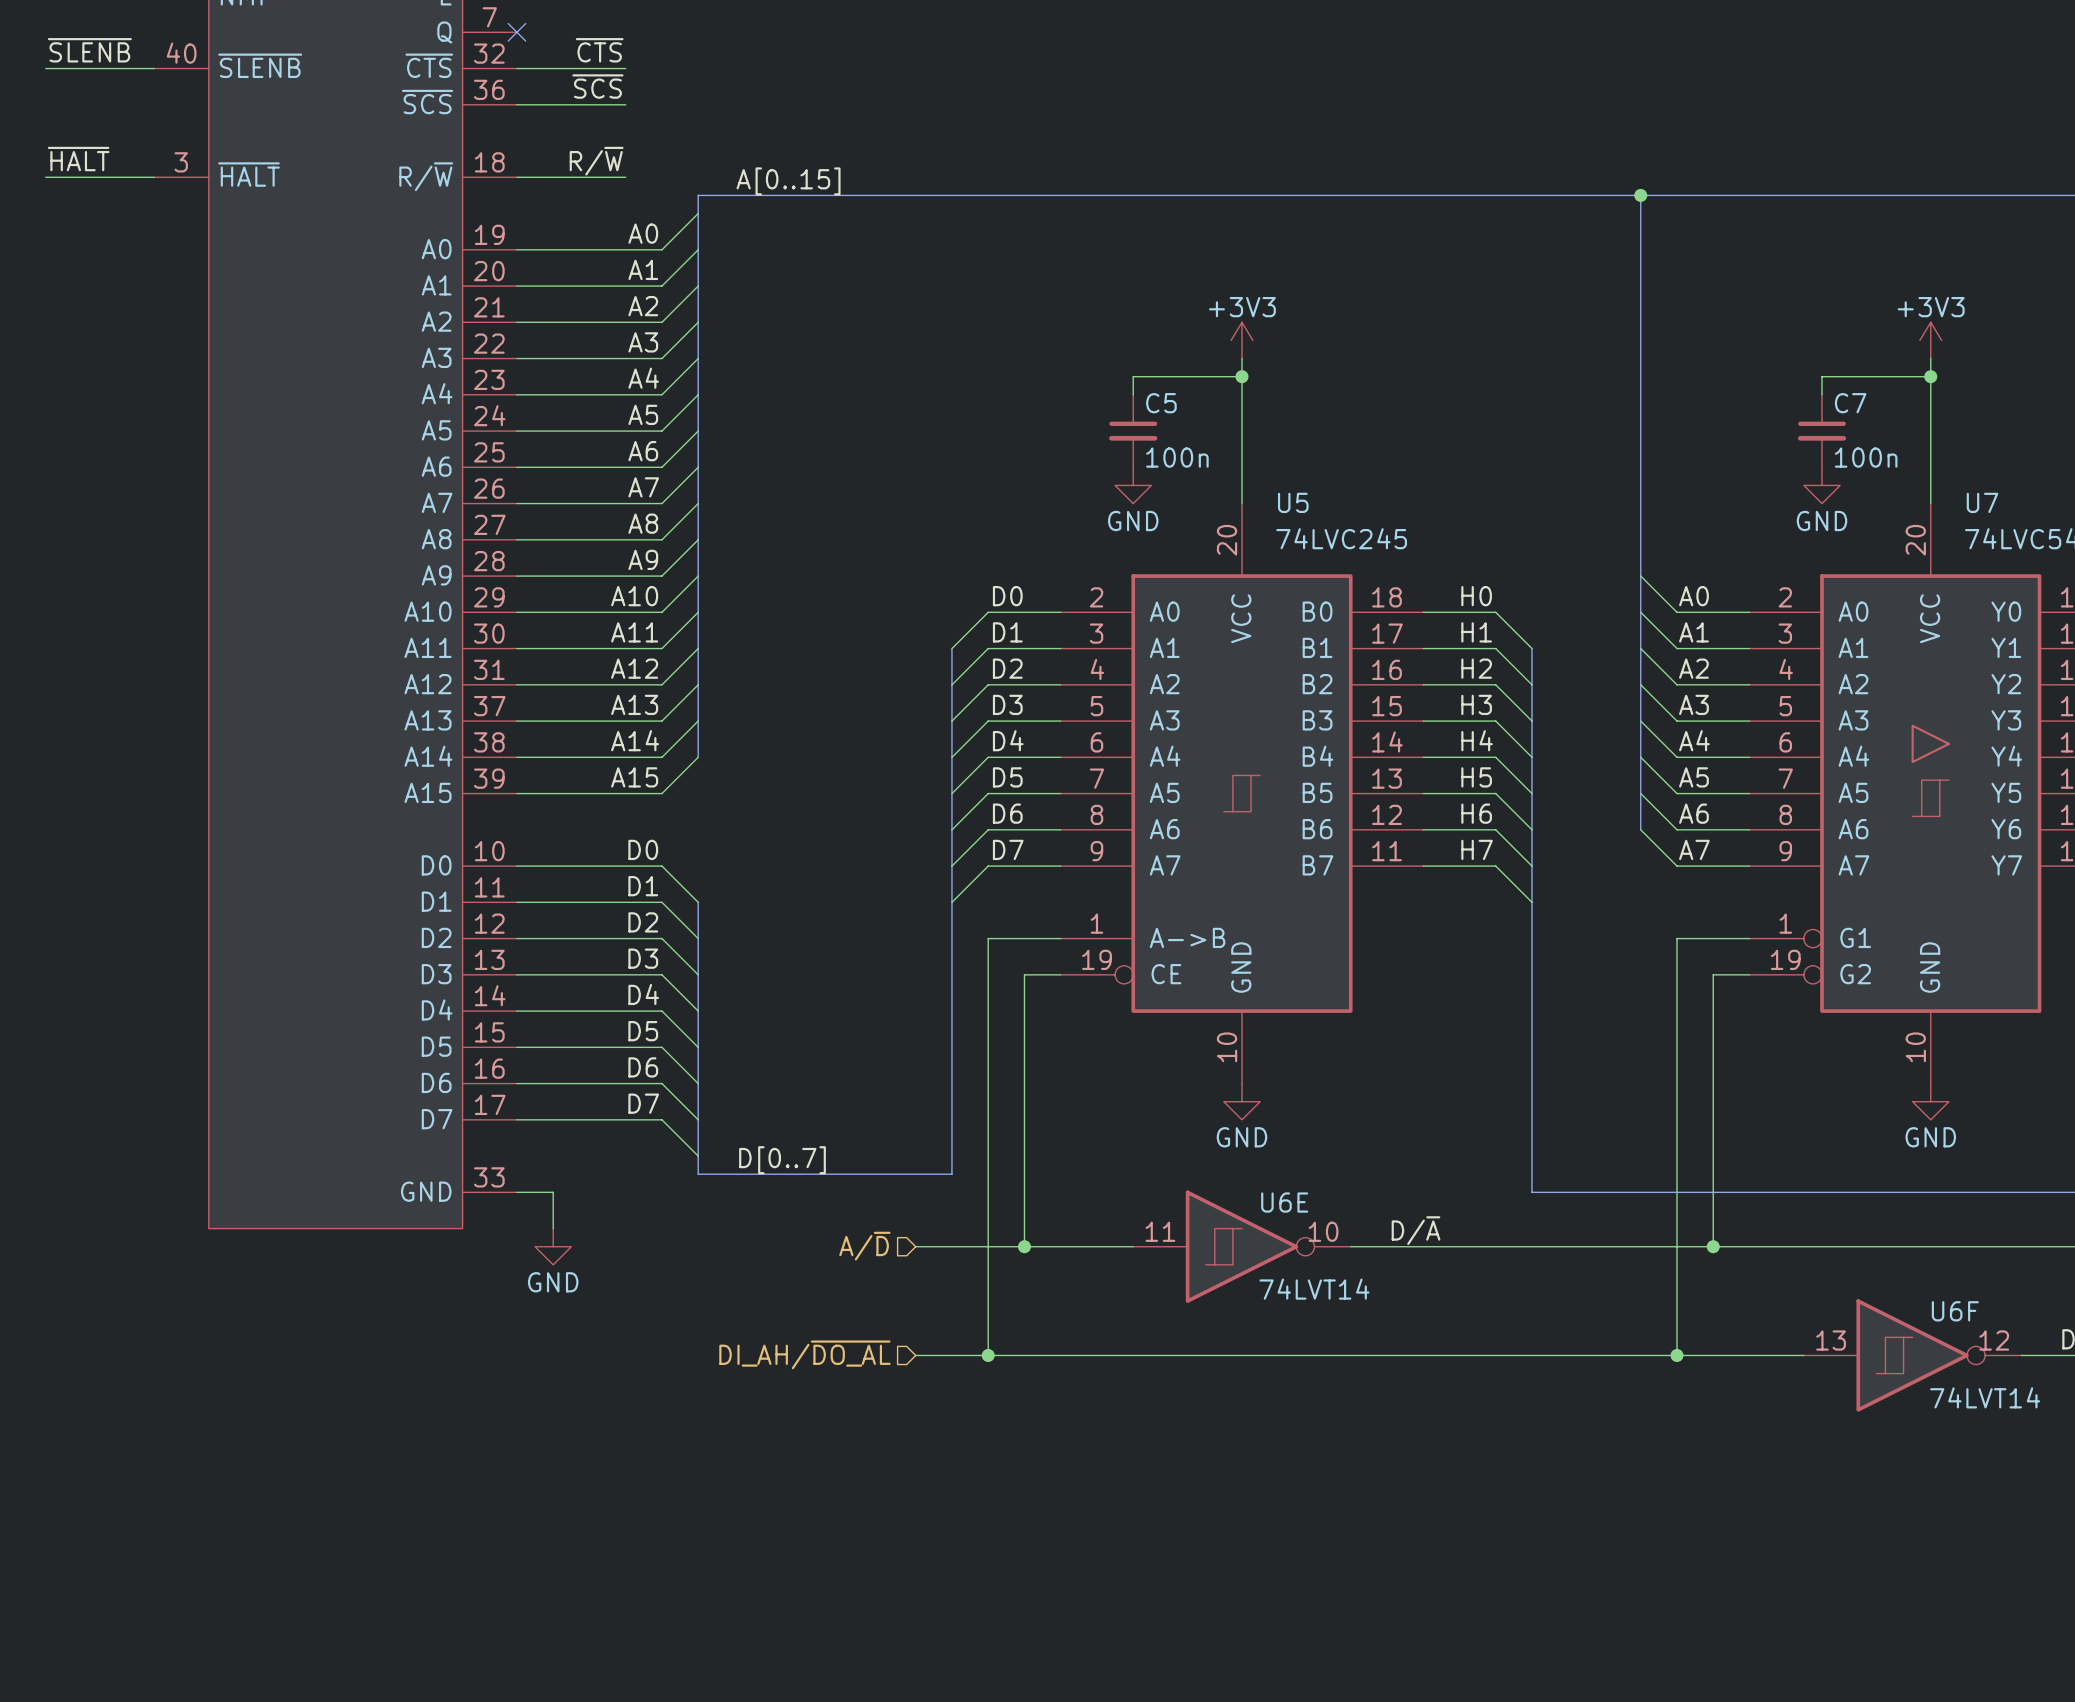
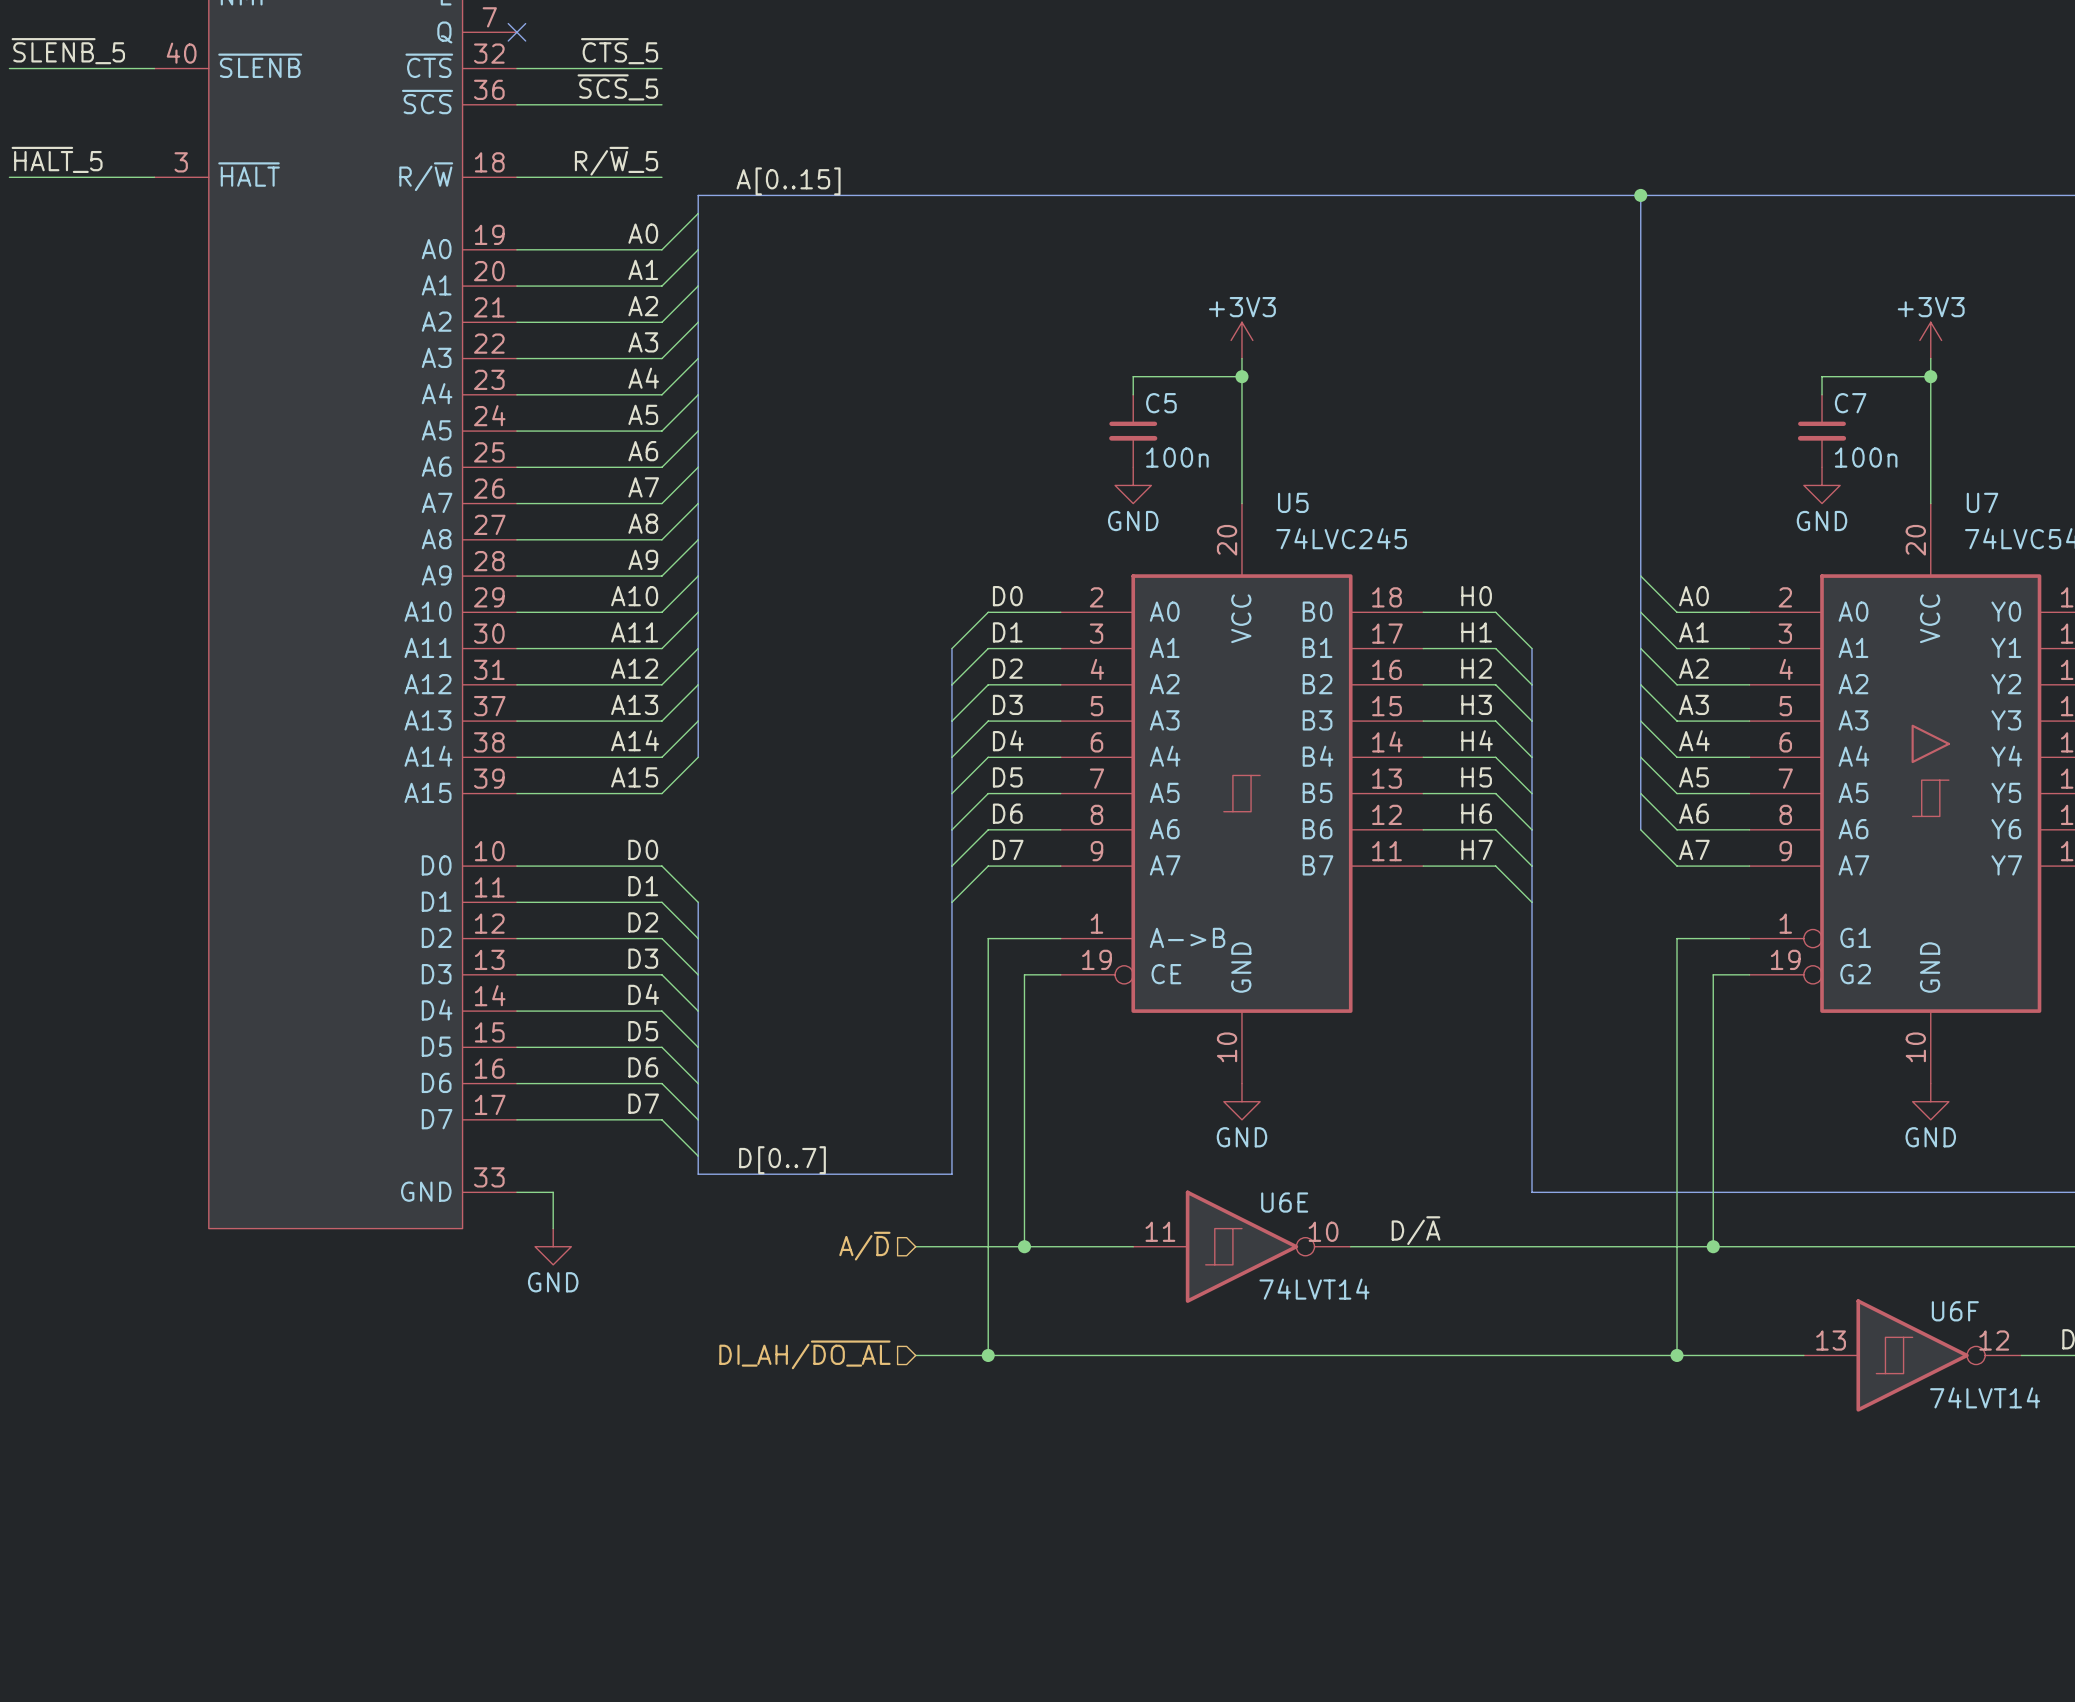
label: ~{SLENB} (89, 50) -> ~{SLENB}_5 (68, 51)
label: ~{CTS} (599, 50) -> none
label: none -> ~{CTS}_5 (619, 51)
wire: none -> (9, 68) (45, 68)
wire: none -> (625, 68) (661, 68)
label: ~{SCS} (597, 86) -> none
label: none -> ~{SCS}_5 (617, 87)
wire: none -> (625, 104) (661, 104)
label: ~{HALT} (78, 159) -> ~{HALT}_5 (57, 159)
label: R/~{W} (596, 161) -> R/~{W}_5 (616, 161)
wire: none -> (9, 177) (45, 177)
wire: none -> (625, 177) (661, 177)

